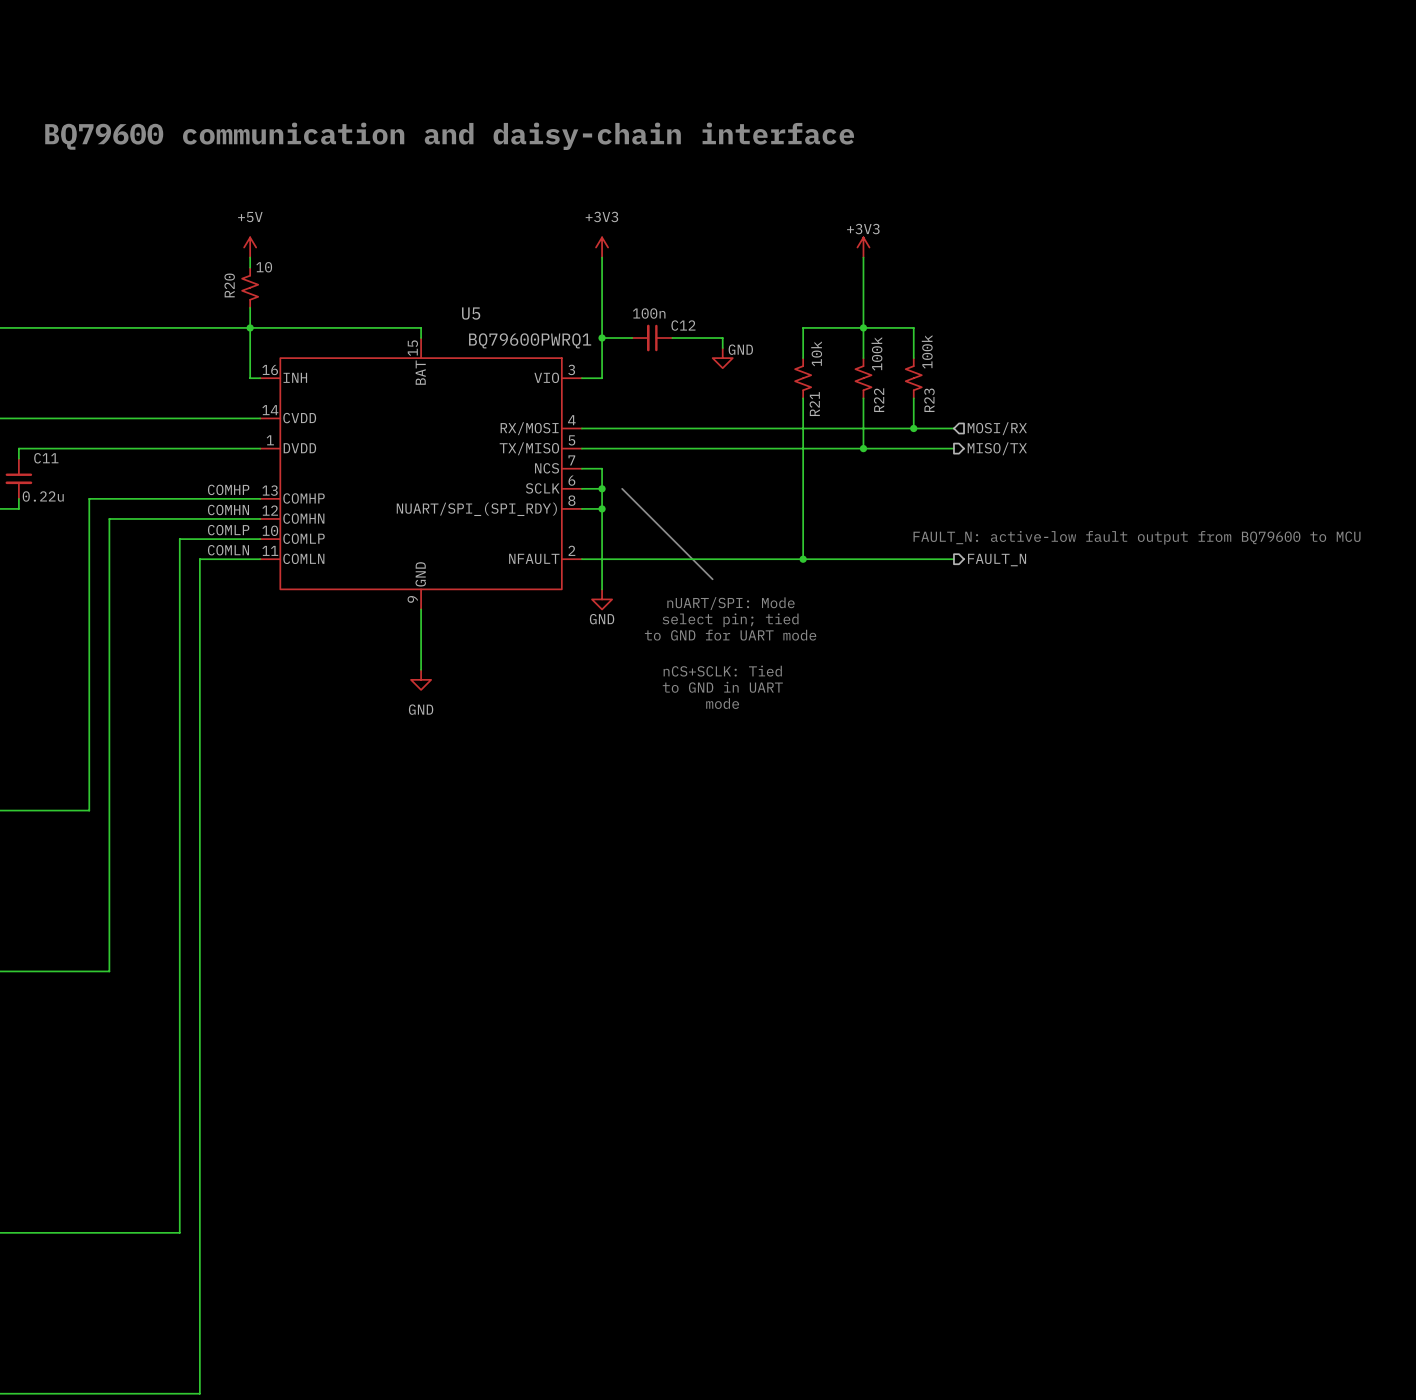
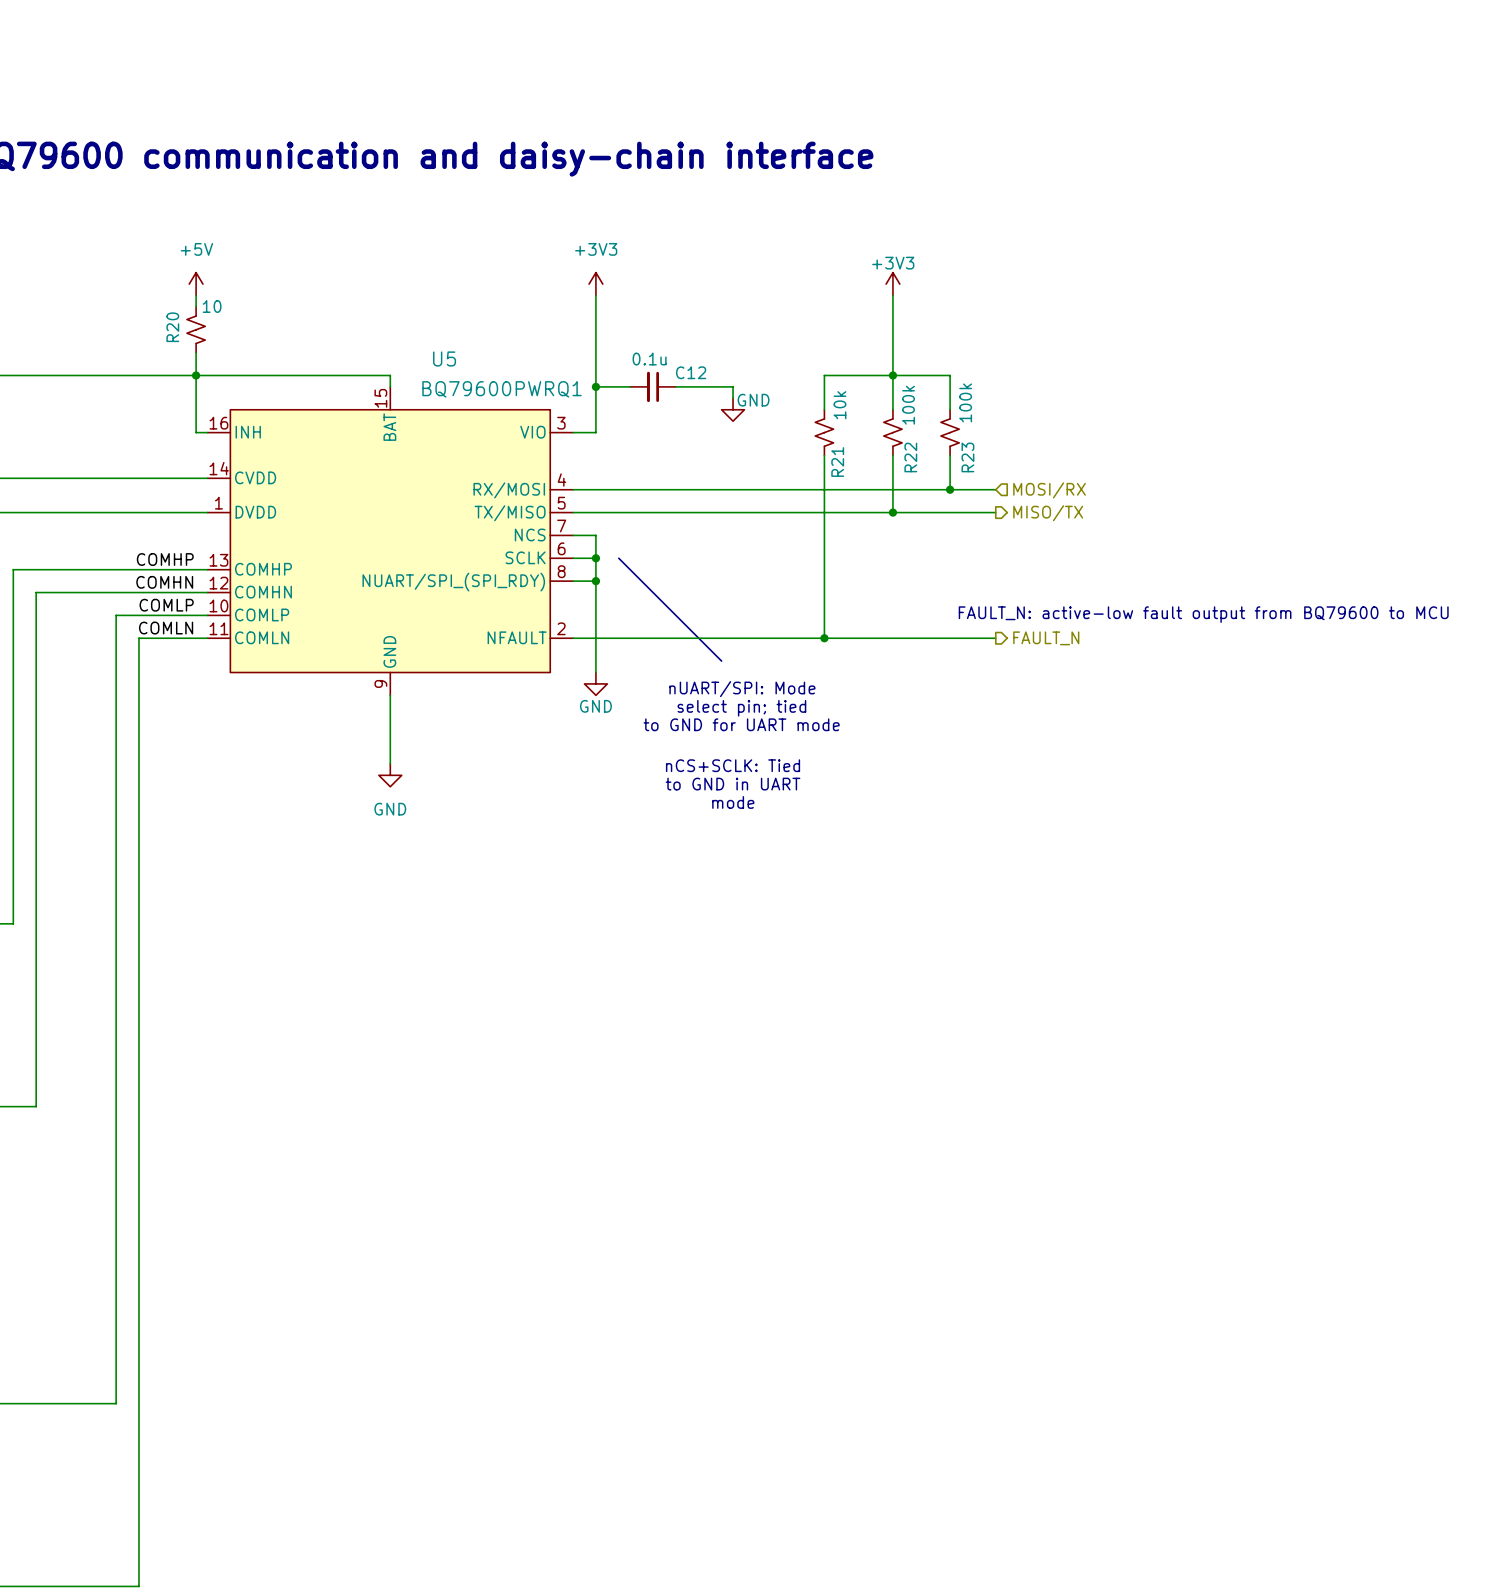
C12 value: 100n (649, 313) -> 0.1u (649, 359)

